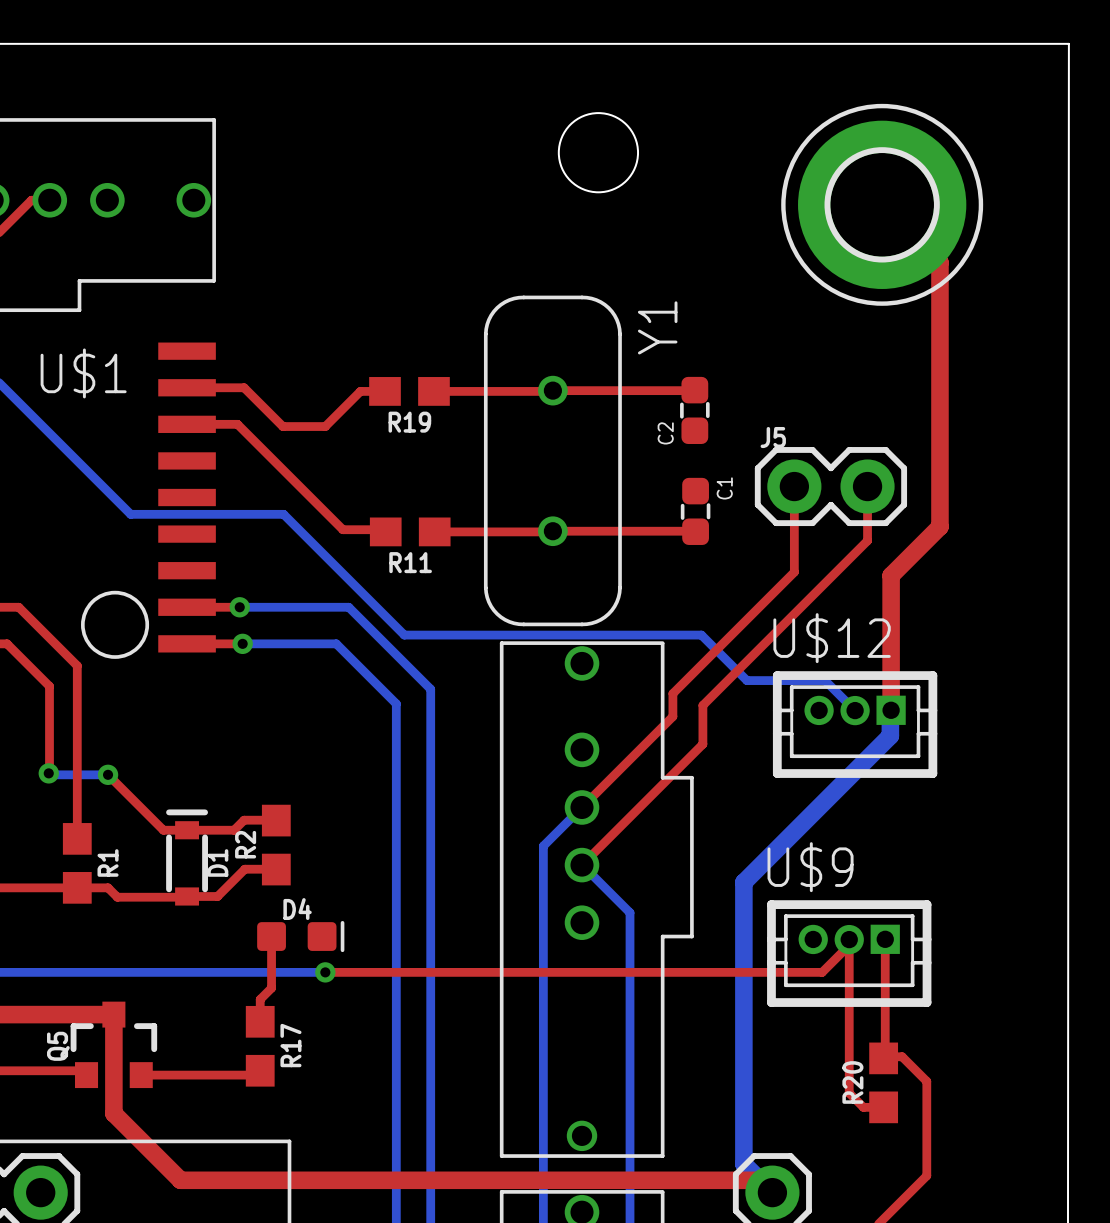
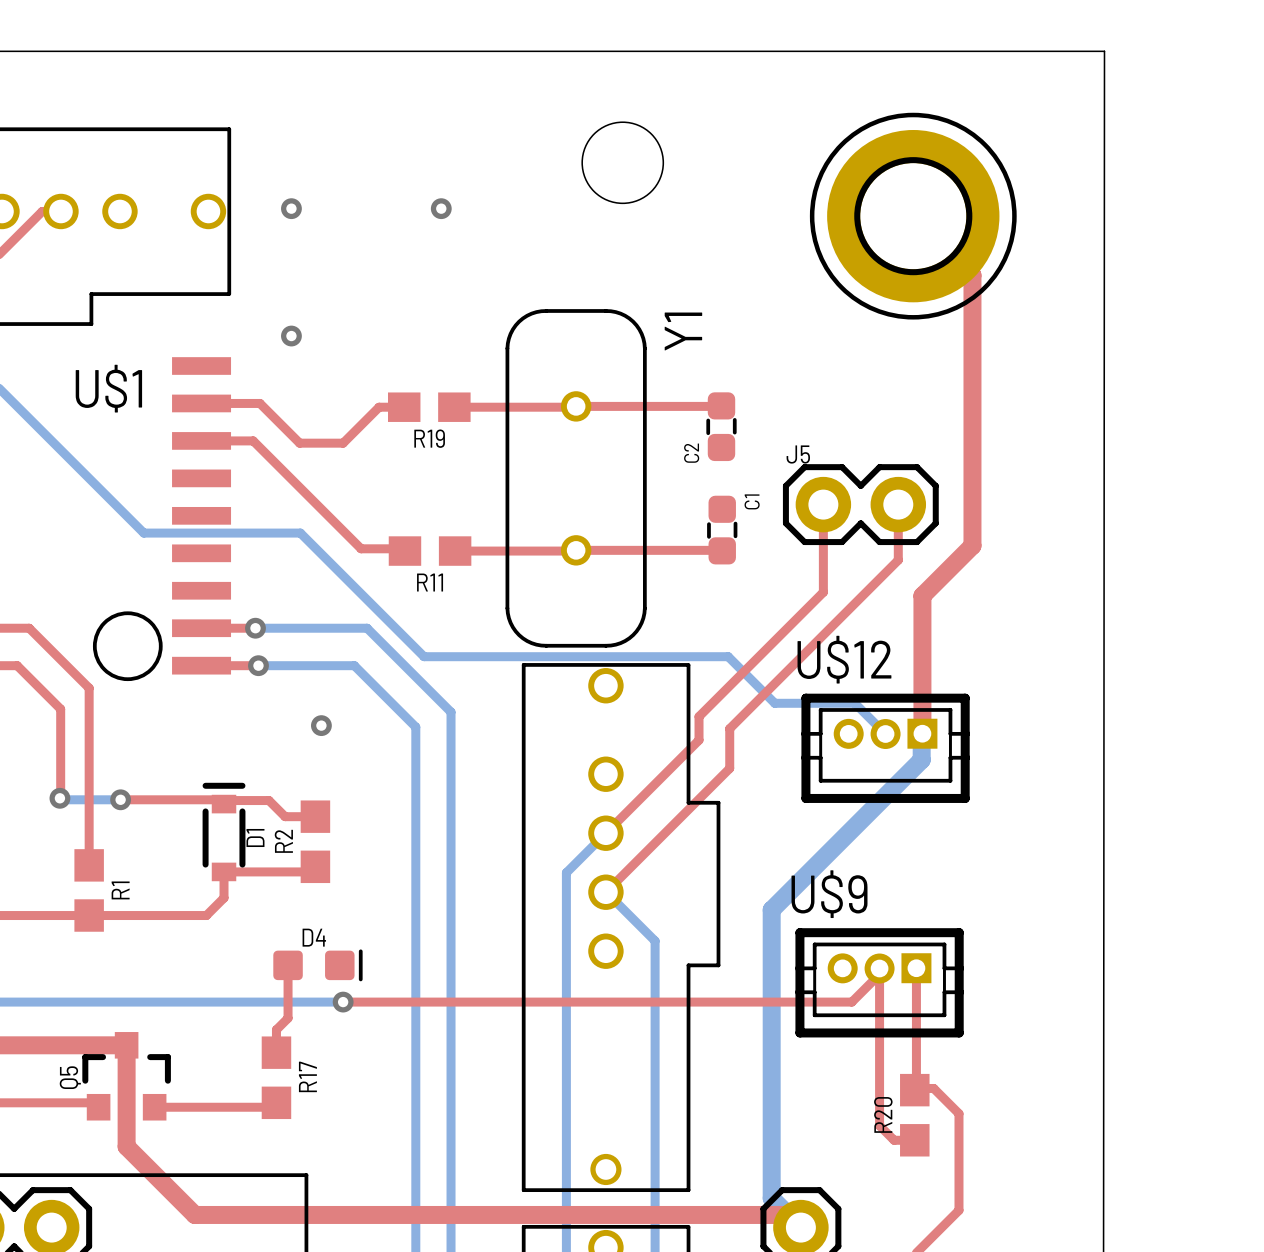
via: none -> (291, 208)
via: none -> (441, 208)
via: none -> (291, 336)
via: none -> (321, 725)
top track: (108, 774) (163, 830) (234, 830) (244, 820) (275, 820) -> (120, 799) (219, 799) (224, 804) (227, 800) (268, 800) (285, 816) (315, 816)
R2 position: (276, 845) -> (315, 841)
D1 position: (187, 857) -> (224, 832)
top track: (275, 869) (244, 869) (217, 896) (117, 897) (108, 887) -> (315, 866) (310, 871) (224, 871) (224, 897) (206, 915) (120, 915)

